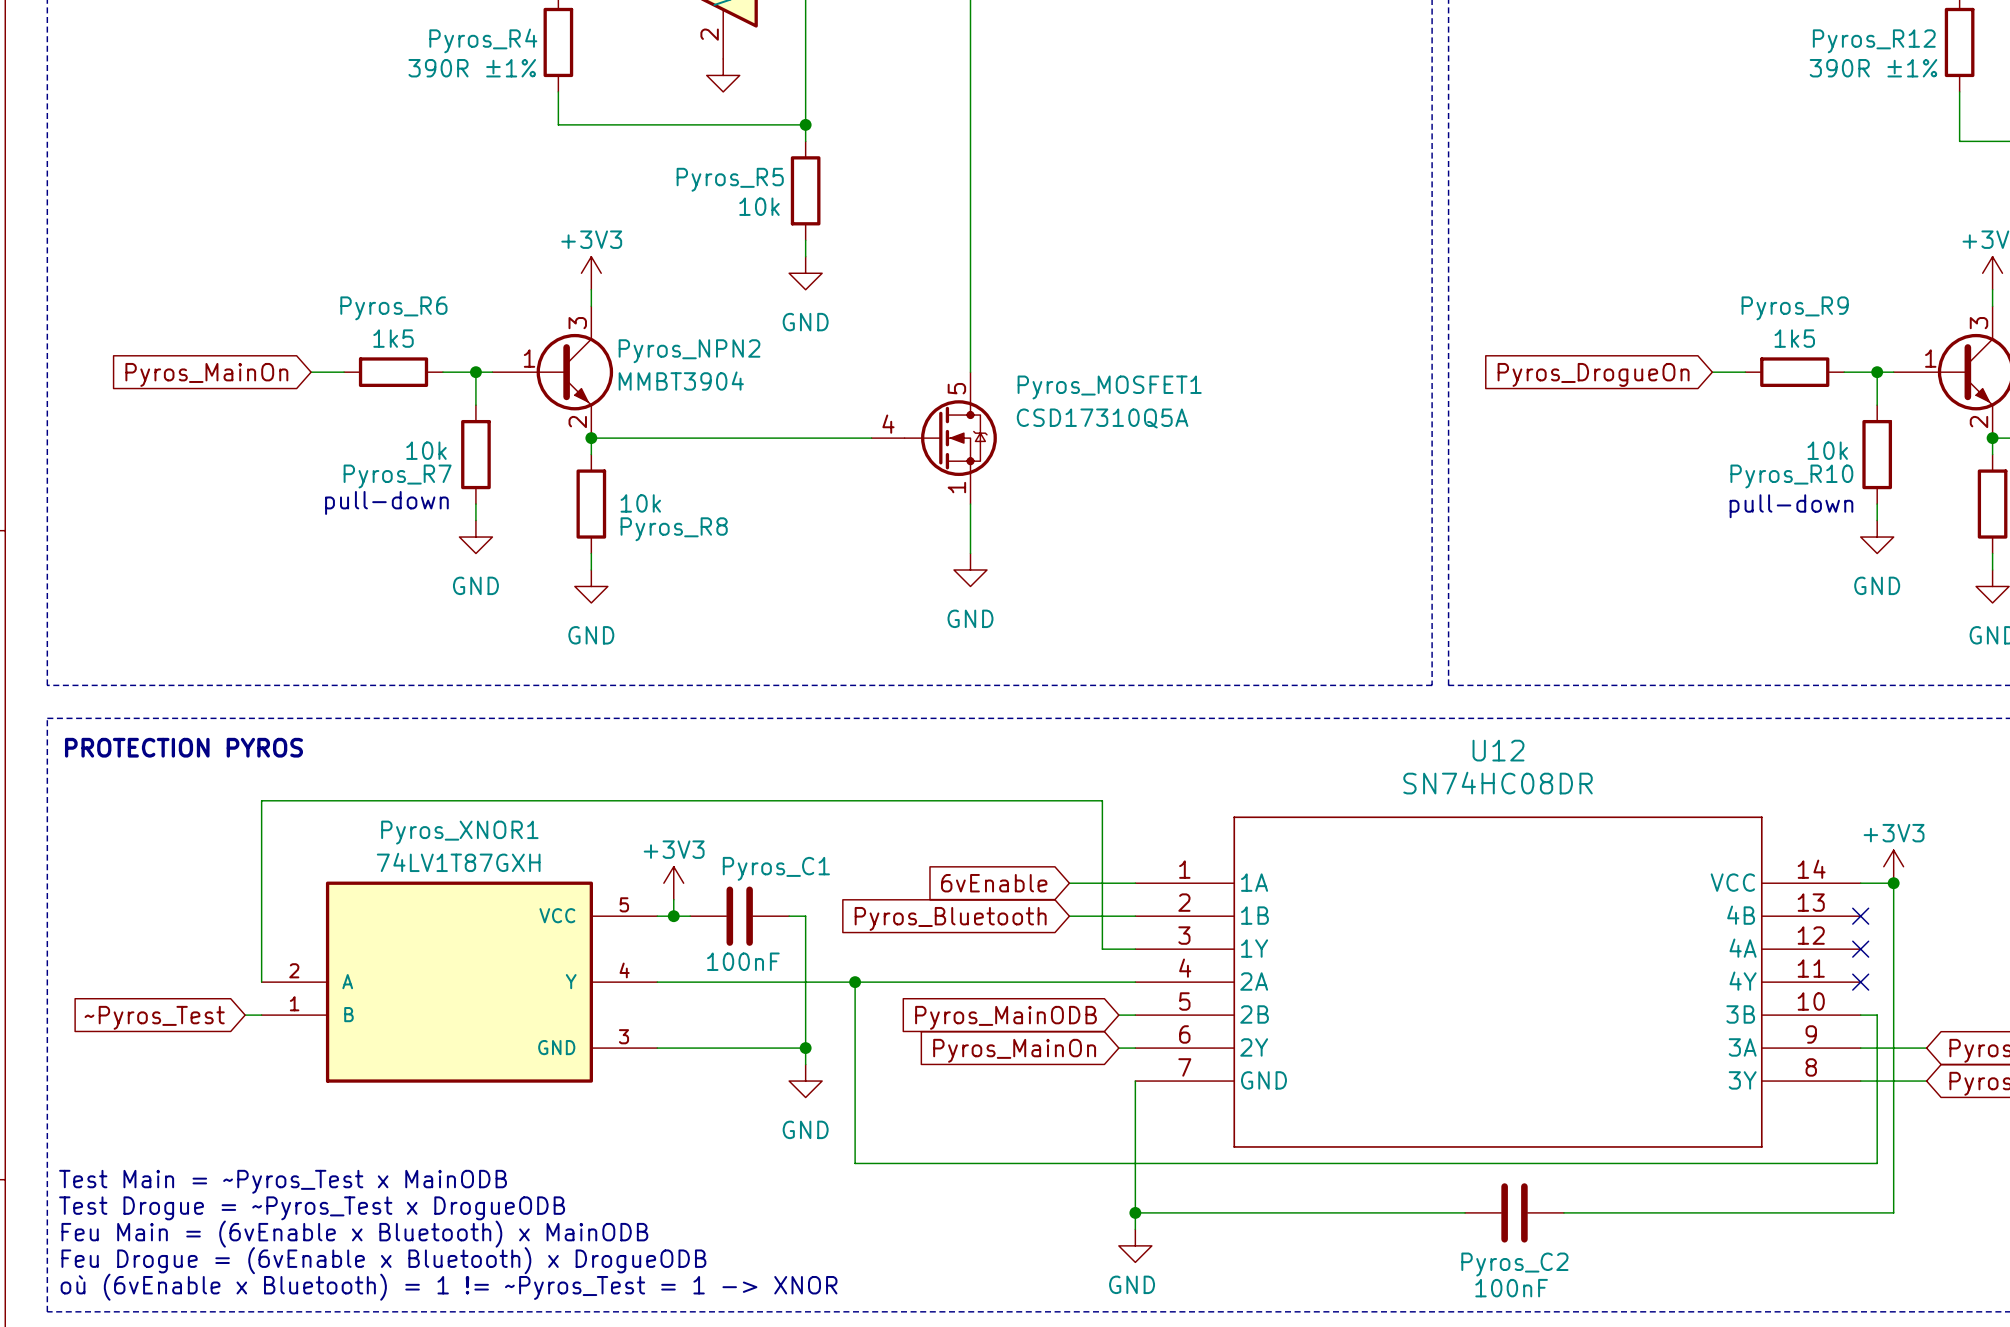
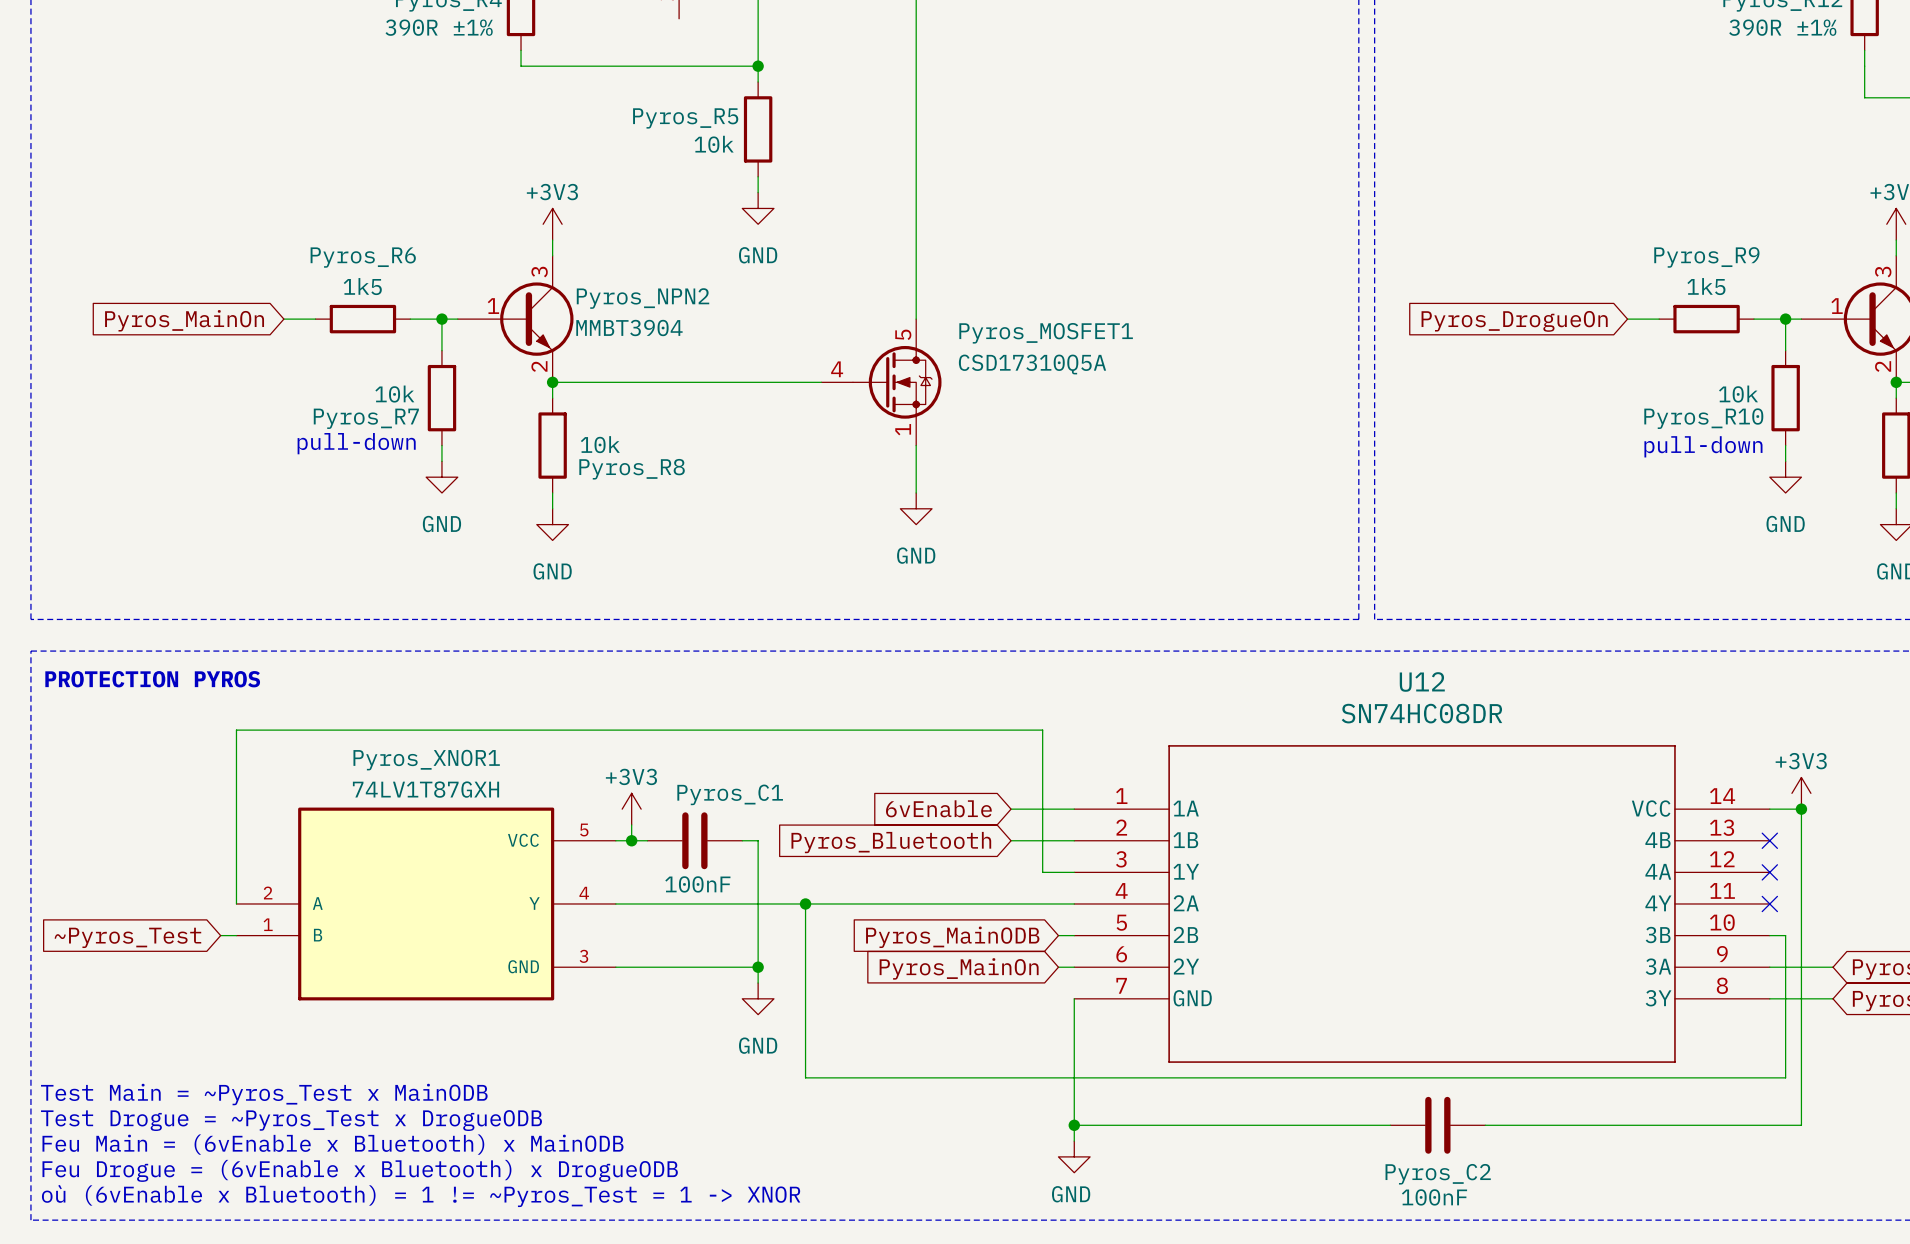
power symbol: (723, 75) -> none
wire: (558, 108) (558, 124) (805, 124) (805, 141) -> (521, 66) (758, 66)
junction position: (805, 124) -> (758, 66)
Pyros_R5 position: (805, 190) -> (758, 129)
power symbol position: GND (805, 273) -> GND (758, 208)

